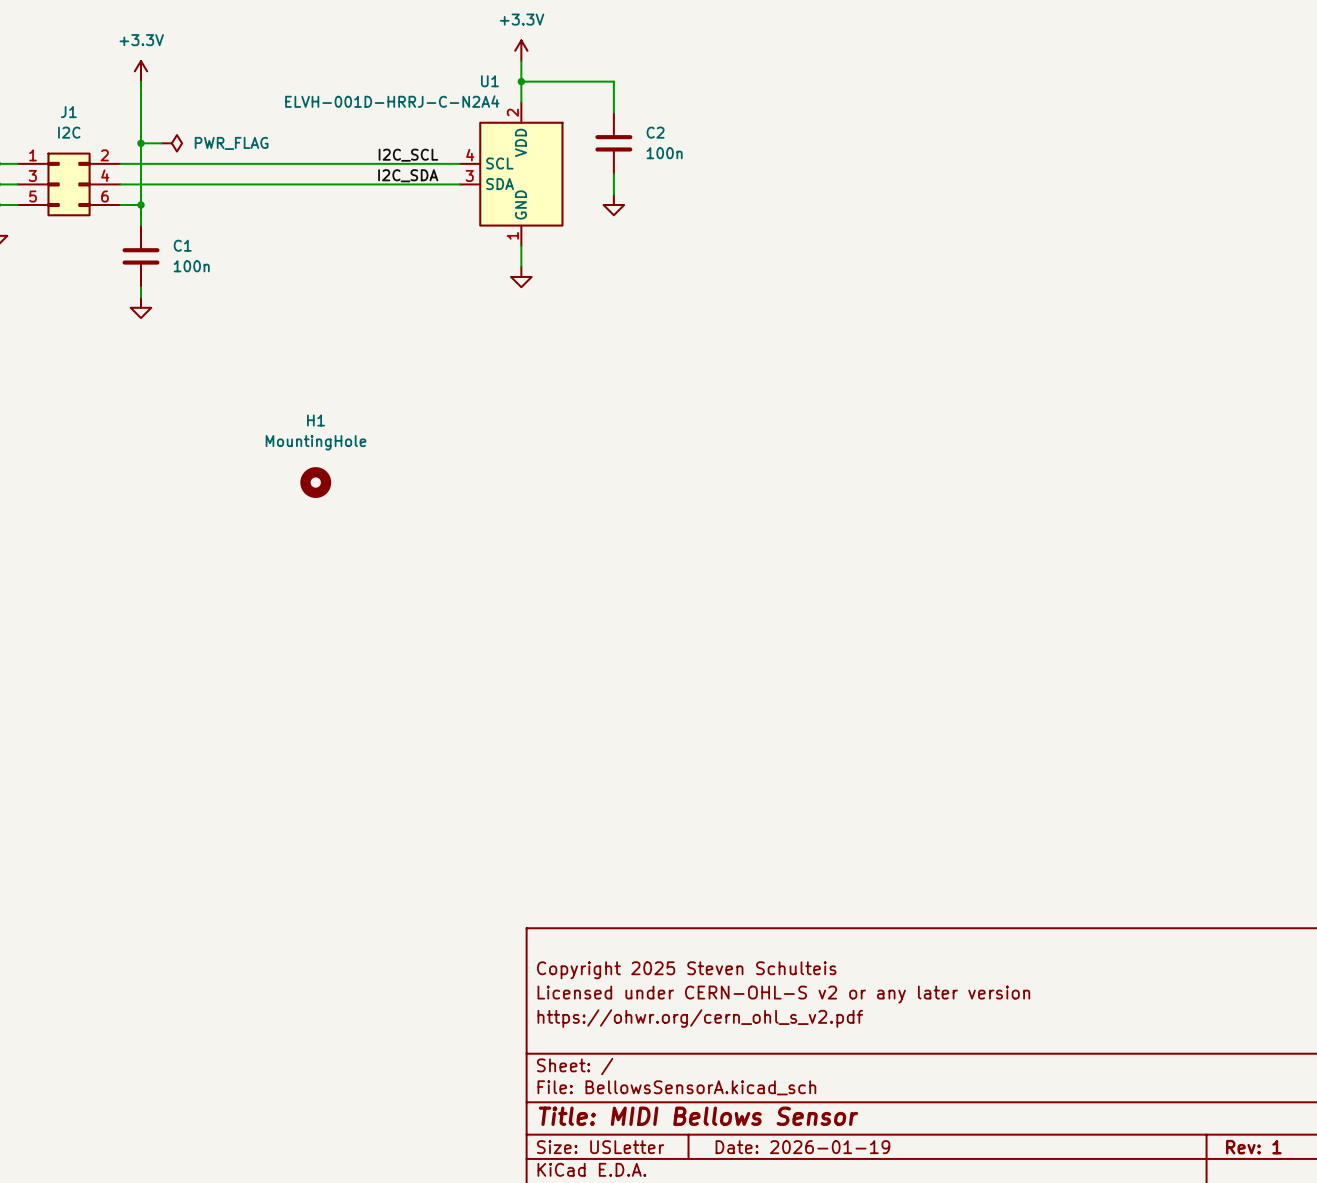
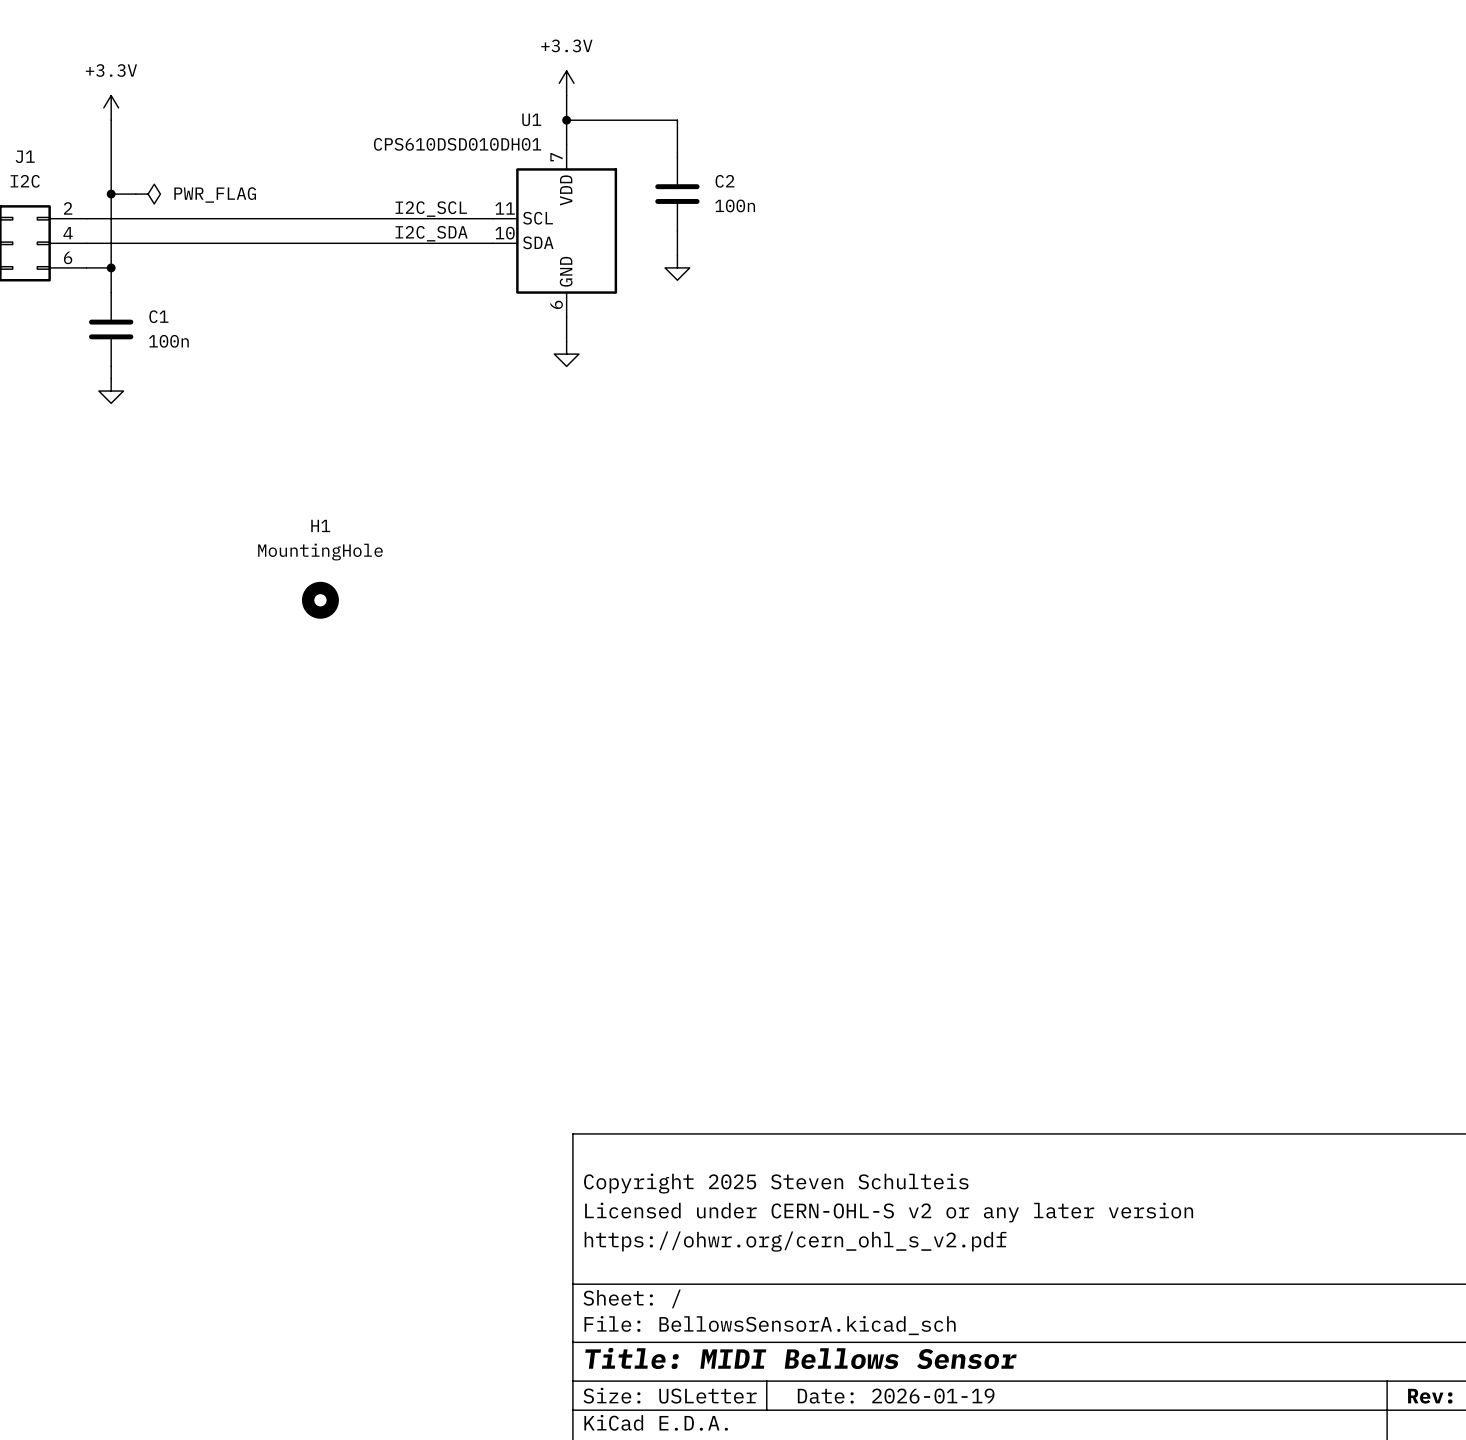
U1 value: ELVH-001D-HRRJ-C-N2A4 (392, 101) -> CPS610DSD010DH01 (457, 144)
U1 pin number: 2 (512, 112) -> 7 (556, 157)
U1 pin number: 4 (470, 155) -> 11 (505, 208)
U1 pin number: 3 (469, 175) -> 10 (505, 233)
U1 pin number: 1 (512, 235) -> 6 (556, 304)

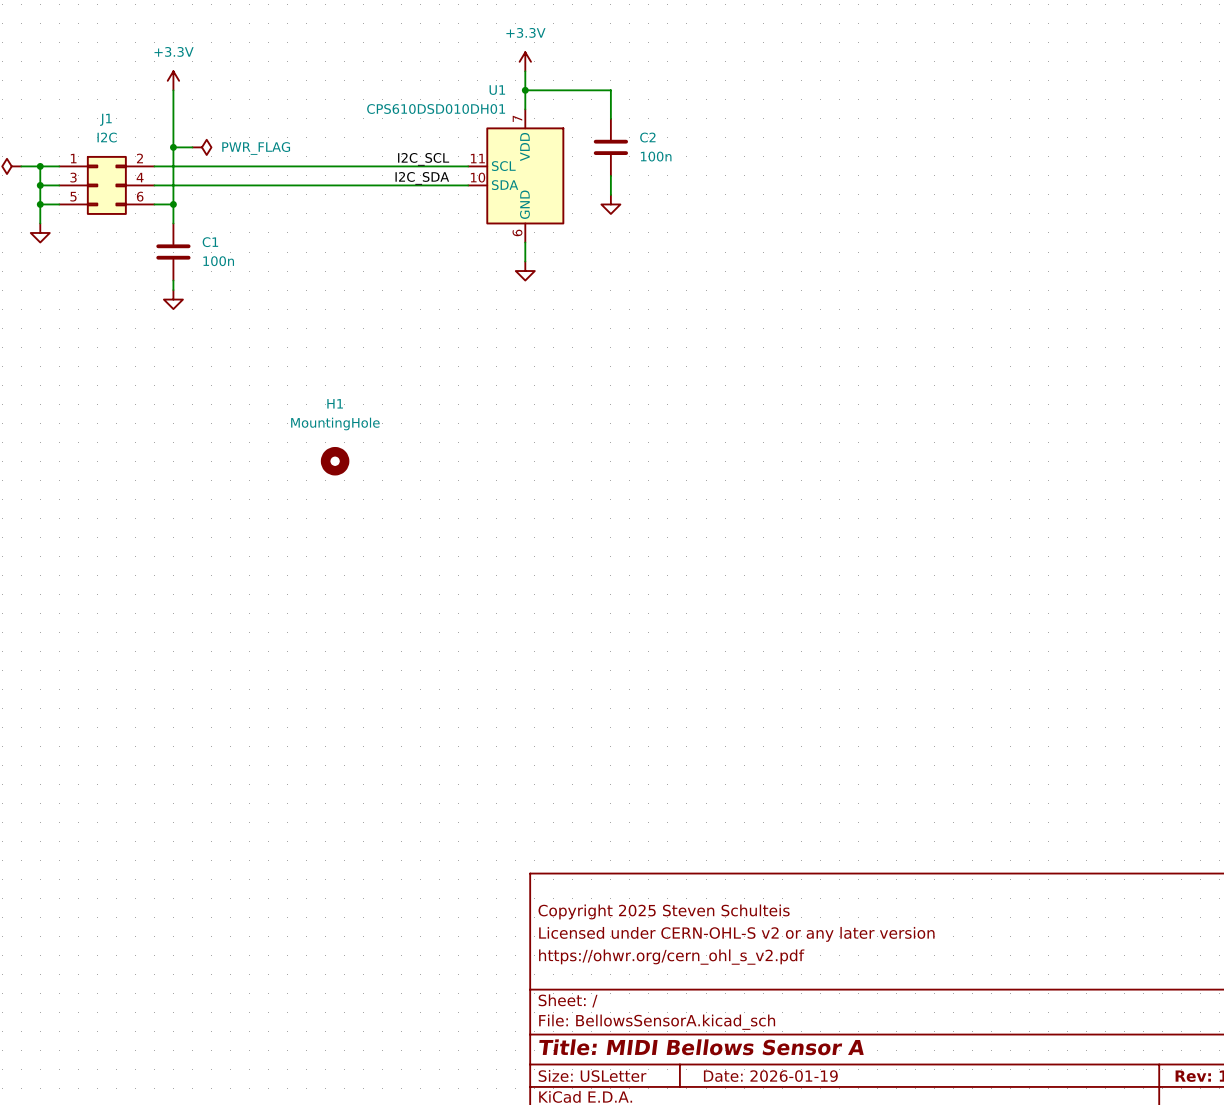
title block: Title: MIDI Bellows Sensor (800, 1358) -> Title: MIDI Bellows Sensor A (701, 1047)

